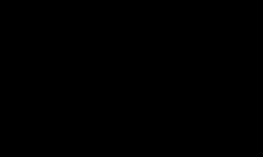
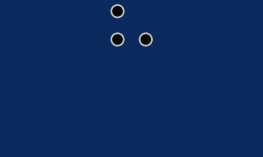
via: none -> (117, 11)
via: none -> (117, 39)
via: none -> (145, 39)

